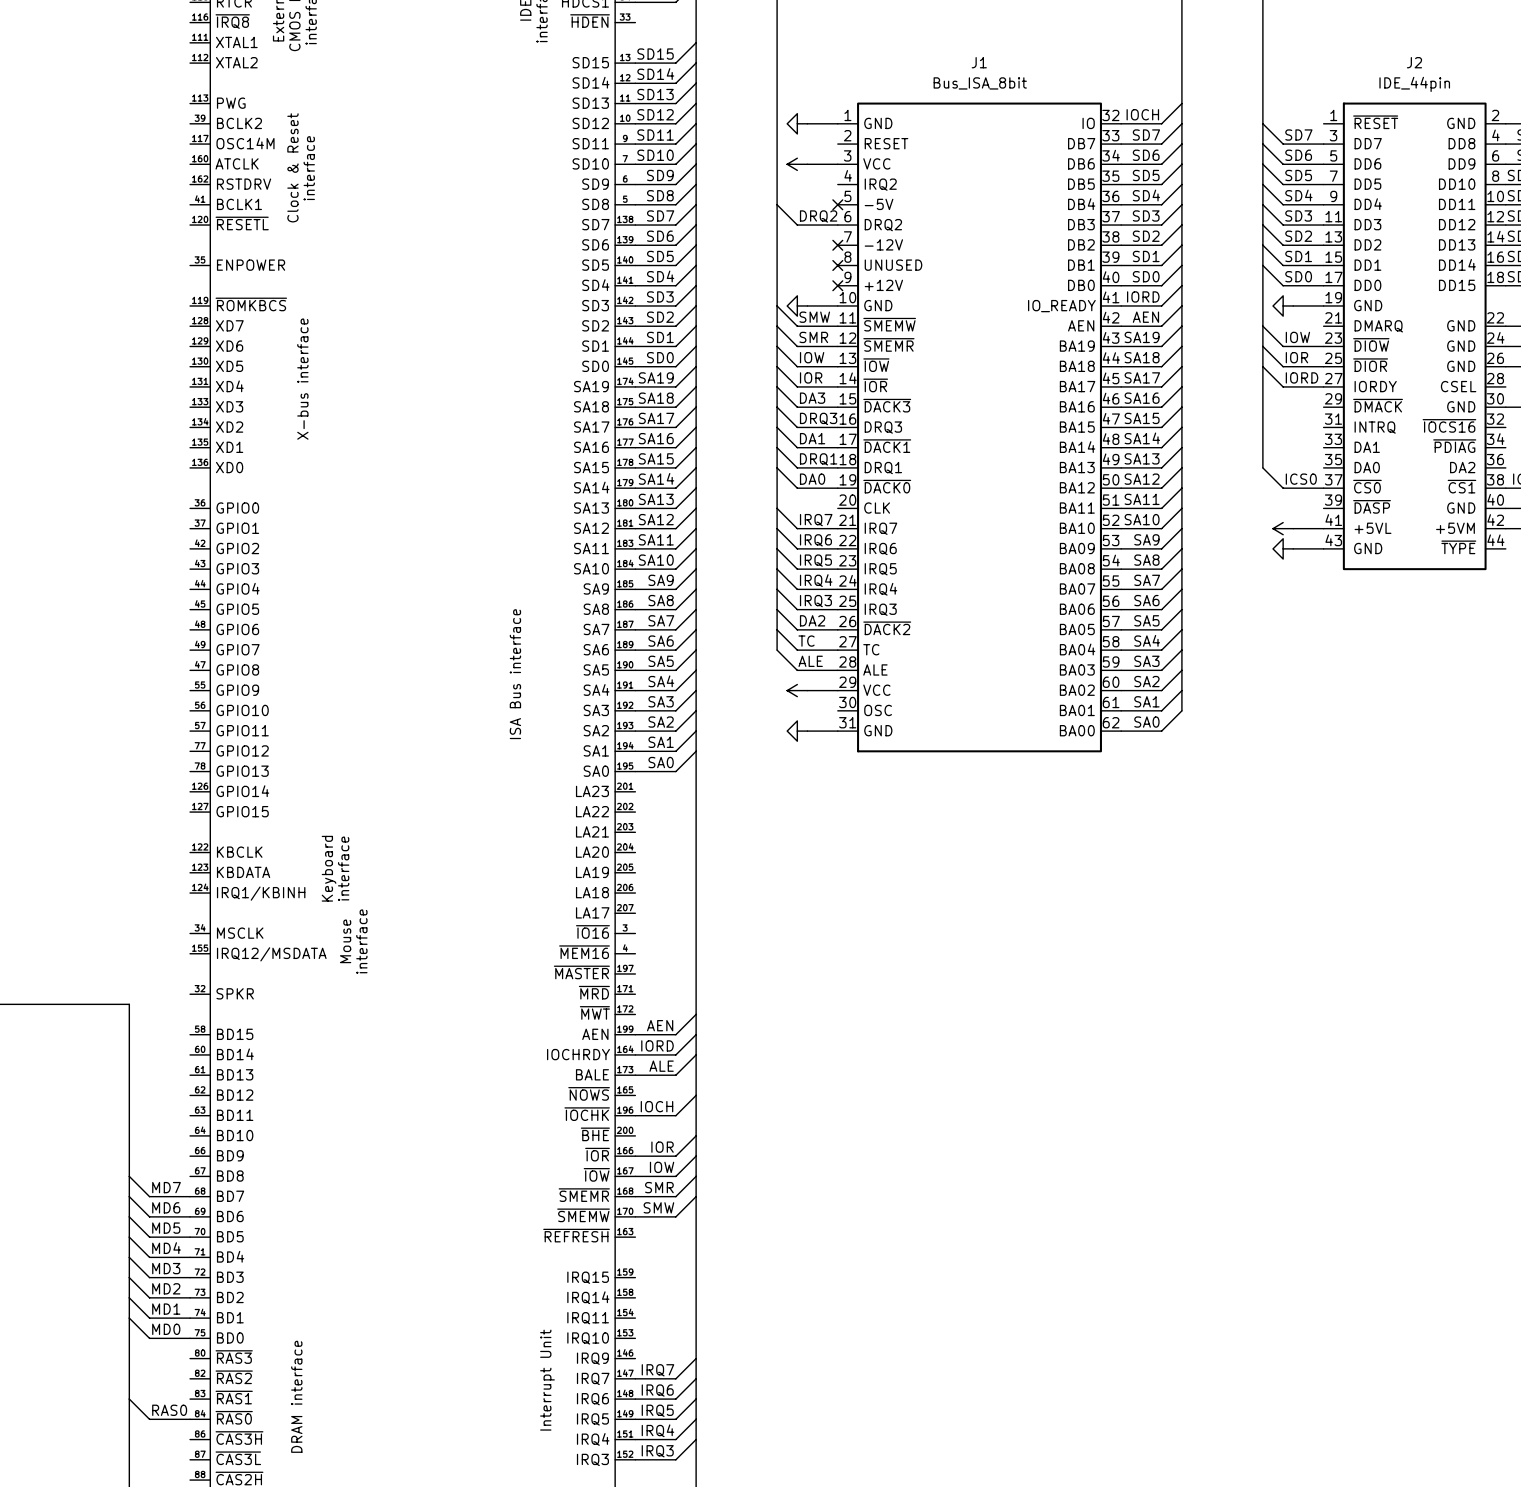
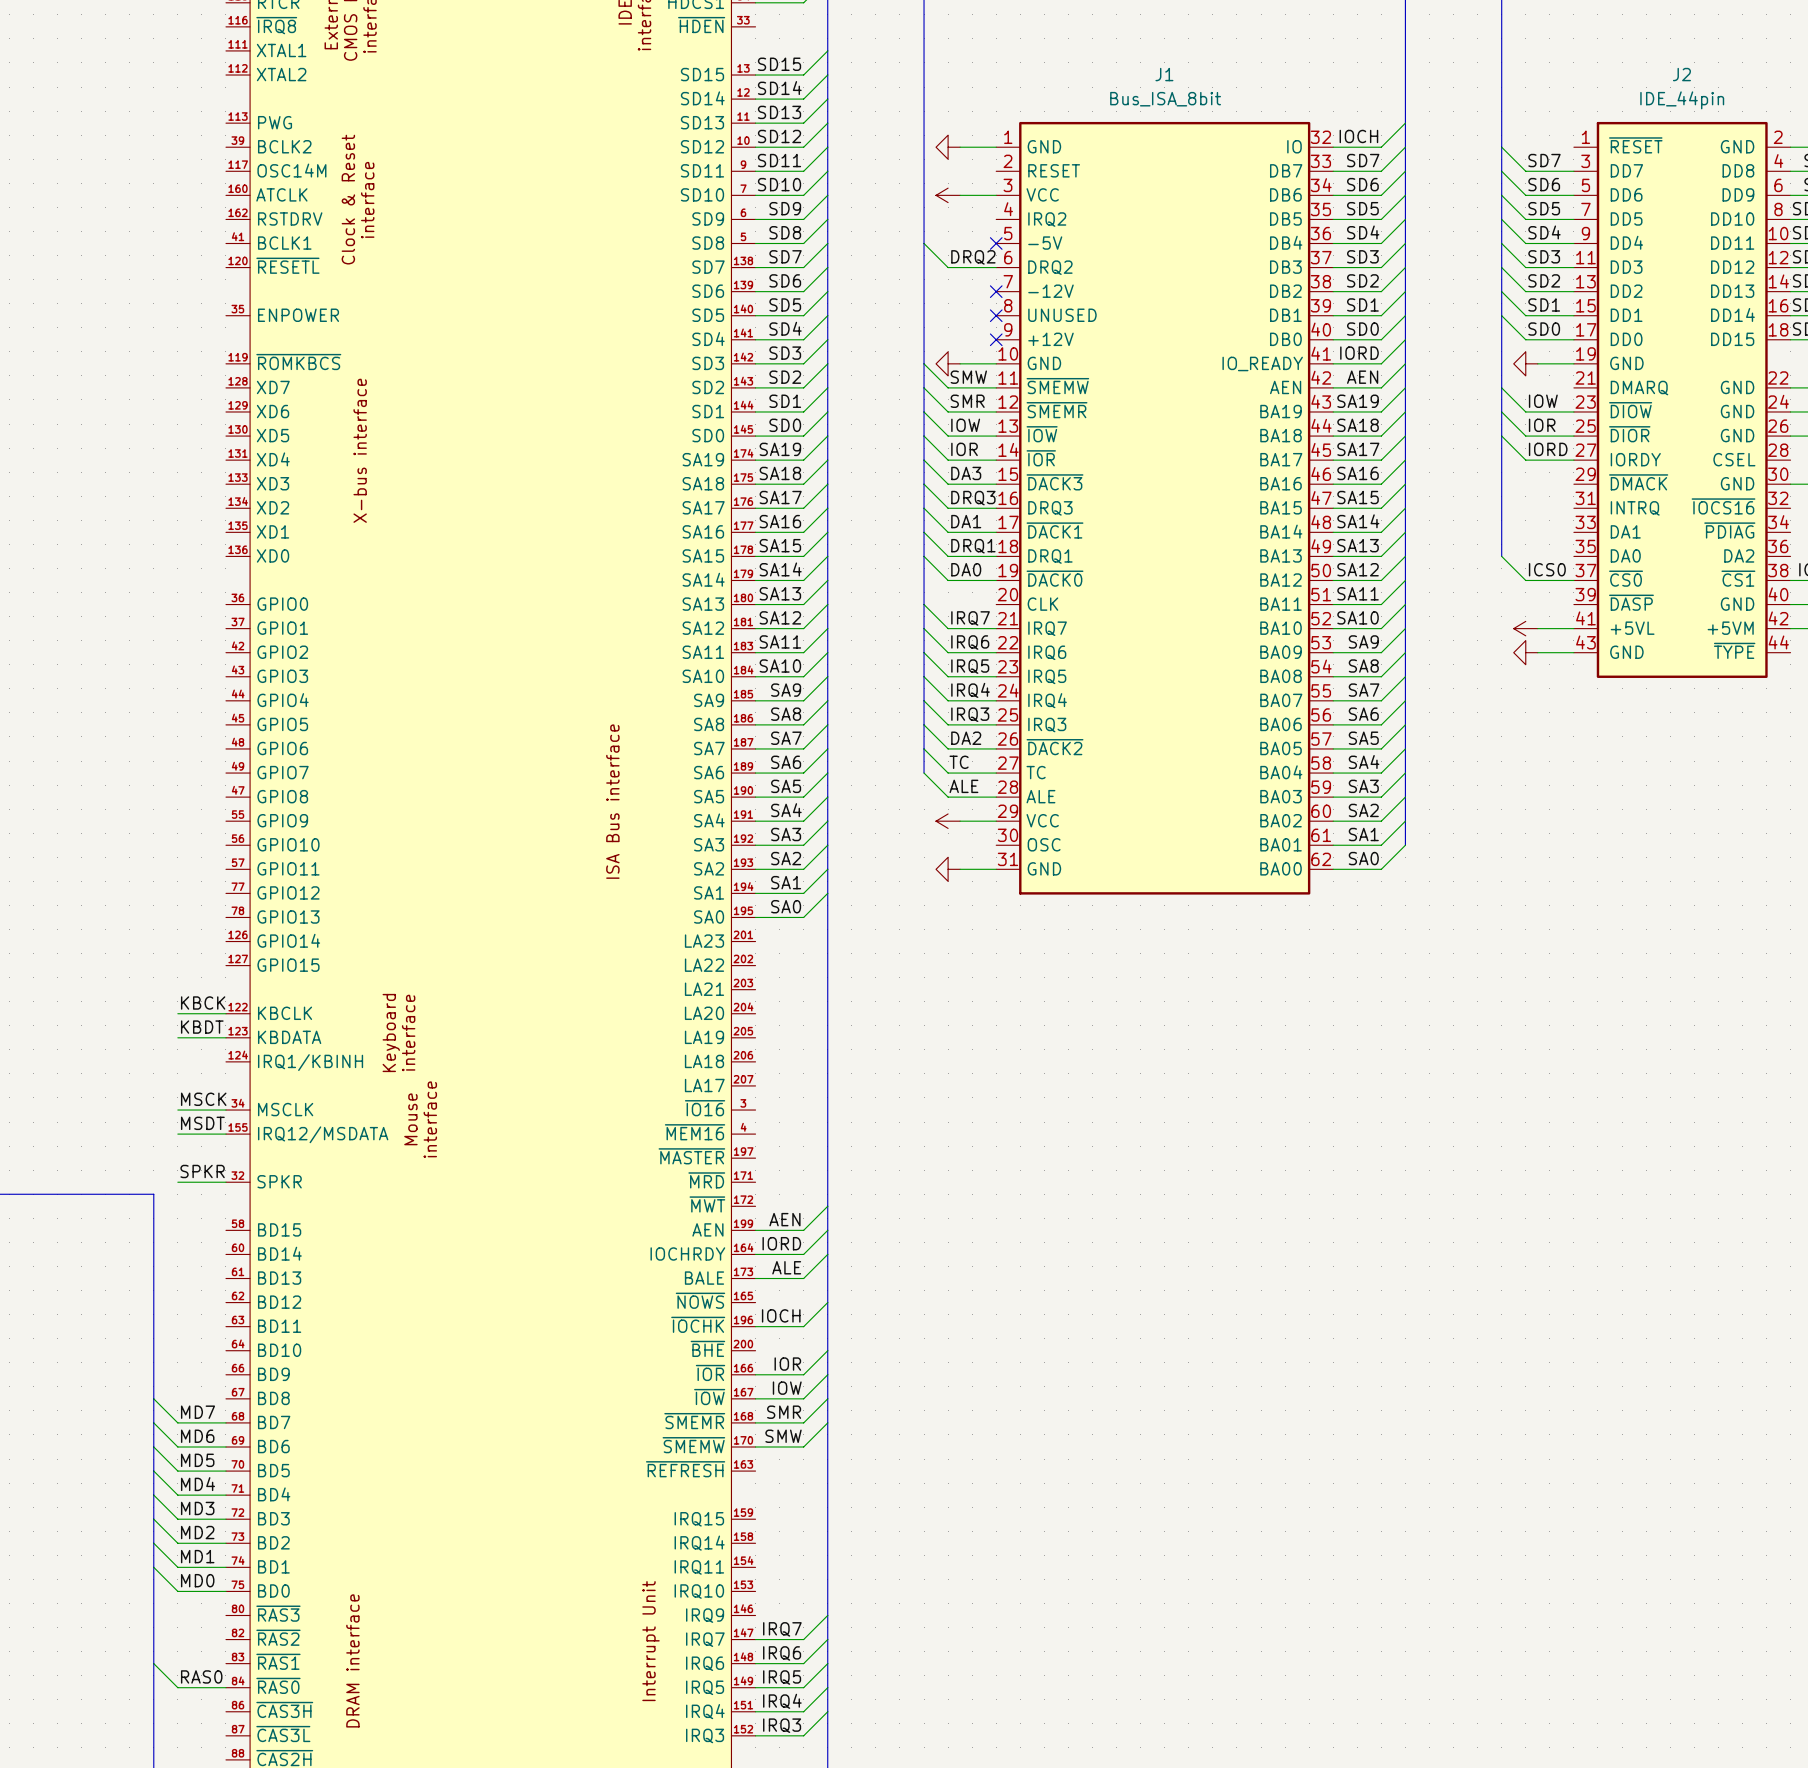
label: none -> KBCK (203, 1003)
wire: none -> (177, 1013) (225, 1013)
label: none -> KBDT (202, 1027)
wire: none -> (177, 1037) (225, 1037)
label: none -> MSCK (203, 1099)
wire: none -> (177, 1110) (225, 1110)
label: none -> MSDT (202, 1123)
wire: none -> (177, 1134) (225, 1134)
label: none -> SPKR (202, 1171)
wire: none -> (177, 1182) (225, 1182)

